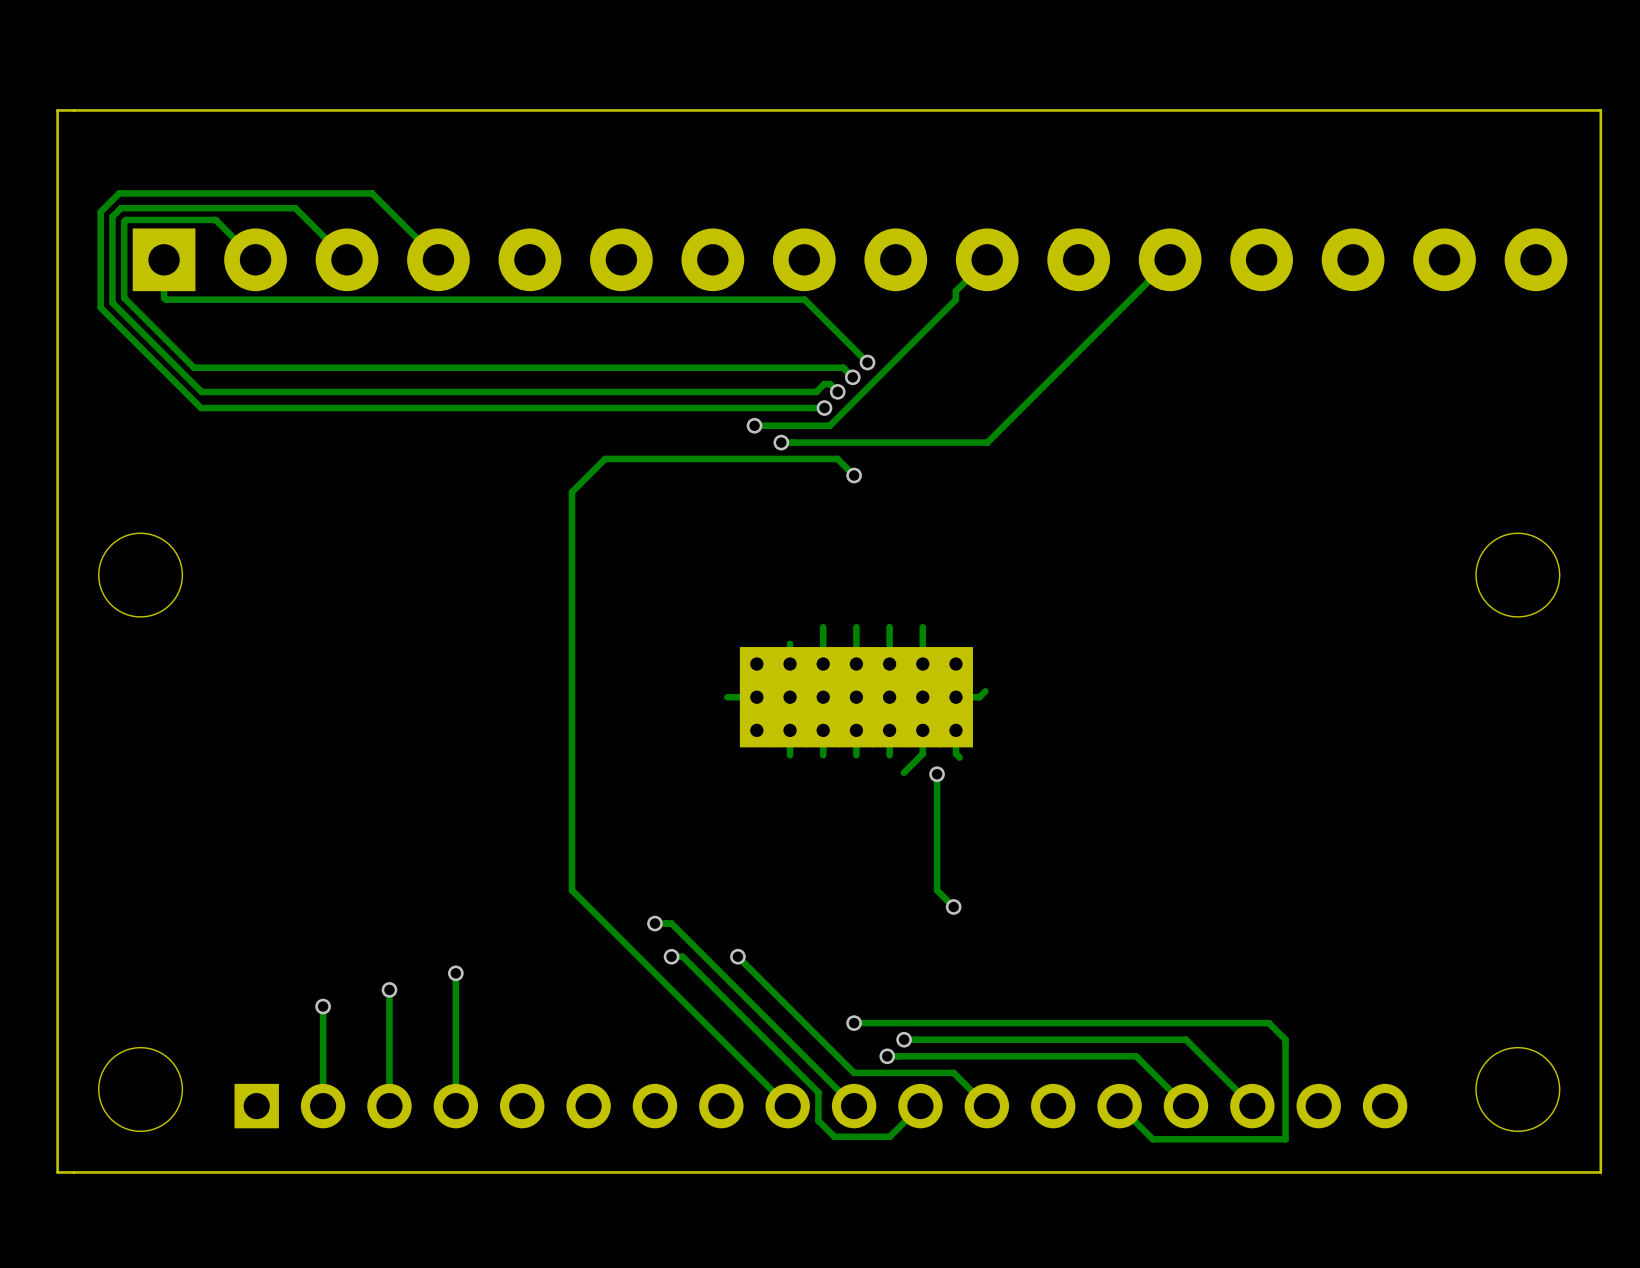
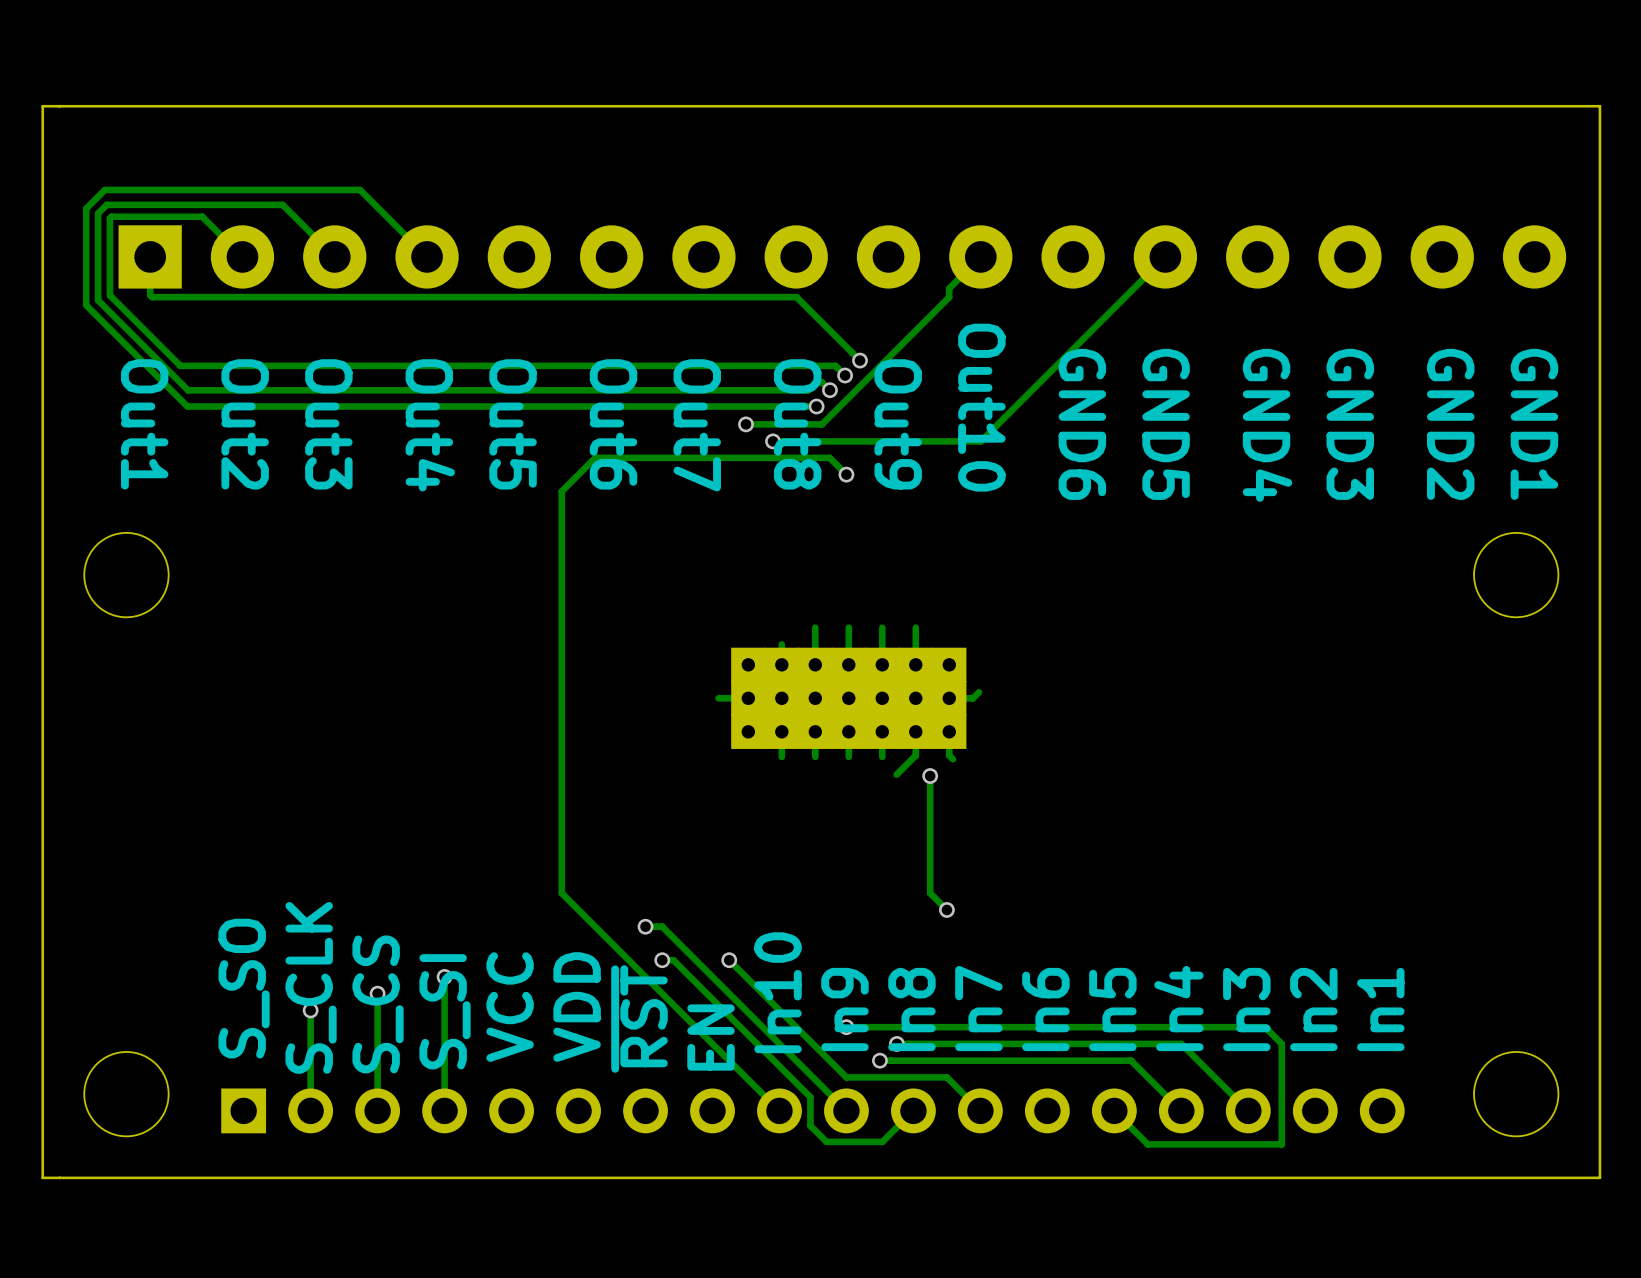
text: none -> Out10 (981, 407)
text: none -> Out1 (144, 424)
text: none -> Out2 (245, 424)
text: none -> Out3 (328, 424)
text: none -> Out5 (513, 424)
text: none -> Out6 (613, 424)
text: none -> Out8 (797, 424)
text: none -> Out9 (898, 424)
text: none -> GND6 (1082, 424)
text: none -> GND5 (1166, 424)
text: none -> GND3 (1350, 424)
text: none -> GND2 (1450, 424)
text: none -> GND1 (1534, 424)
text: none -> Out4 (430, 425)
text: none -> Out7 (697, 425)
text: none -> GND4 (1267, 425)
text: none -> S_SO (244, 988)
text: none -> S_CLK (311, 987)
text: none -> In10 (778, 992)
text: none -> S_CS (378, 1004)
text: none -> VCC (510, 1007)
text: none -> VDD (577, 1007)
text: none -> In7 (978, 1008)
text: none -> In4 (1178, 1008)
text: none -> In9 (844, 1009)
text: none -> In8 (911, 1009)
text: none -> In6 (1045, 1009)
text: none -> In5 (1112, 1009)
text: none -> In3 (1246, 1009)
text: none -> In2 (1313, 1009)
text: none -> In1 (1380, 1009)
text: none -> S_SI (445, 1011)
text: none -> ~{RST} (639, 1018)
text: none -> EN (711, 1037)

